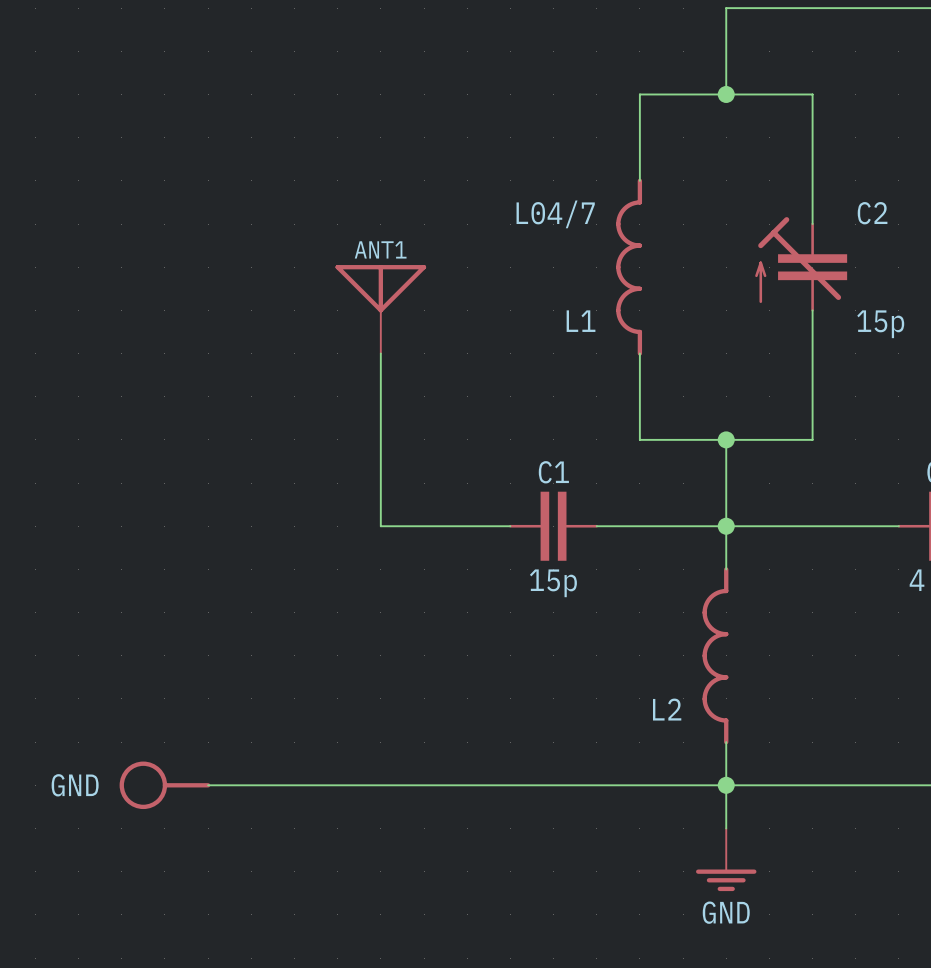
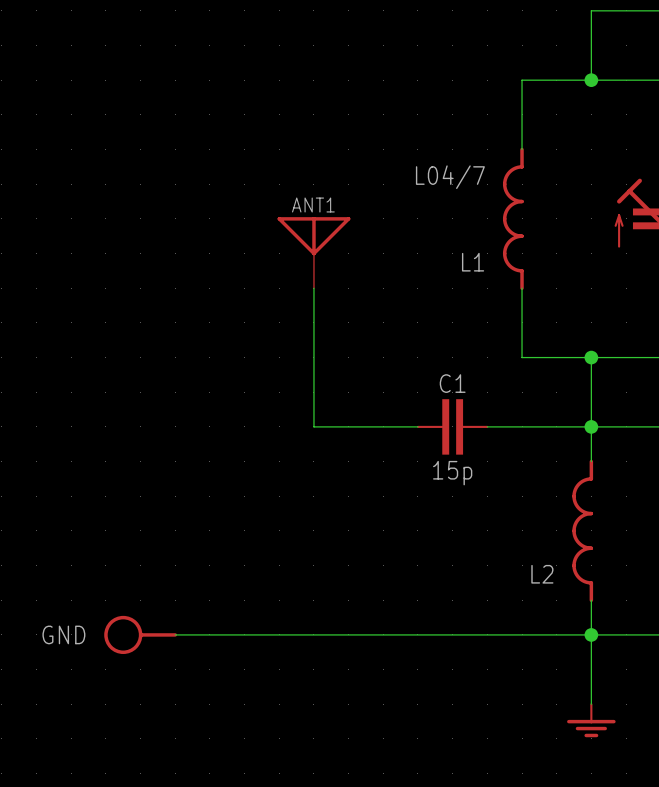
power symbol: GND (726, 859) -> none
power symbol: none -> (591, 720)

